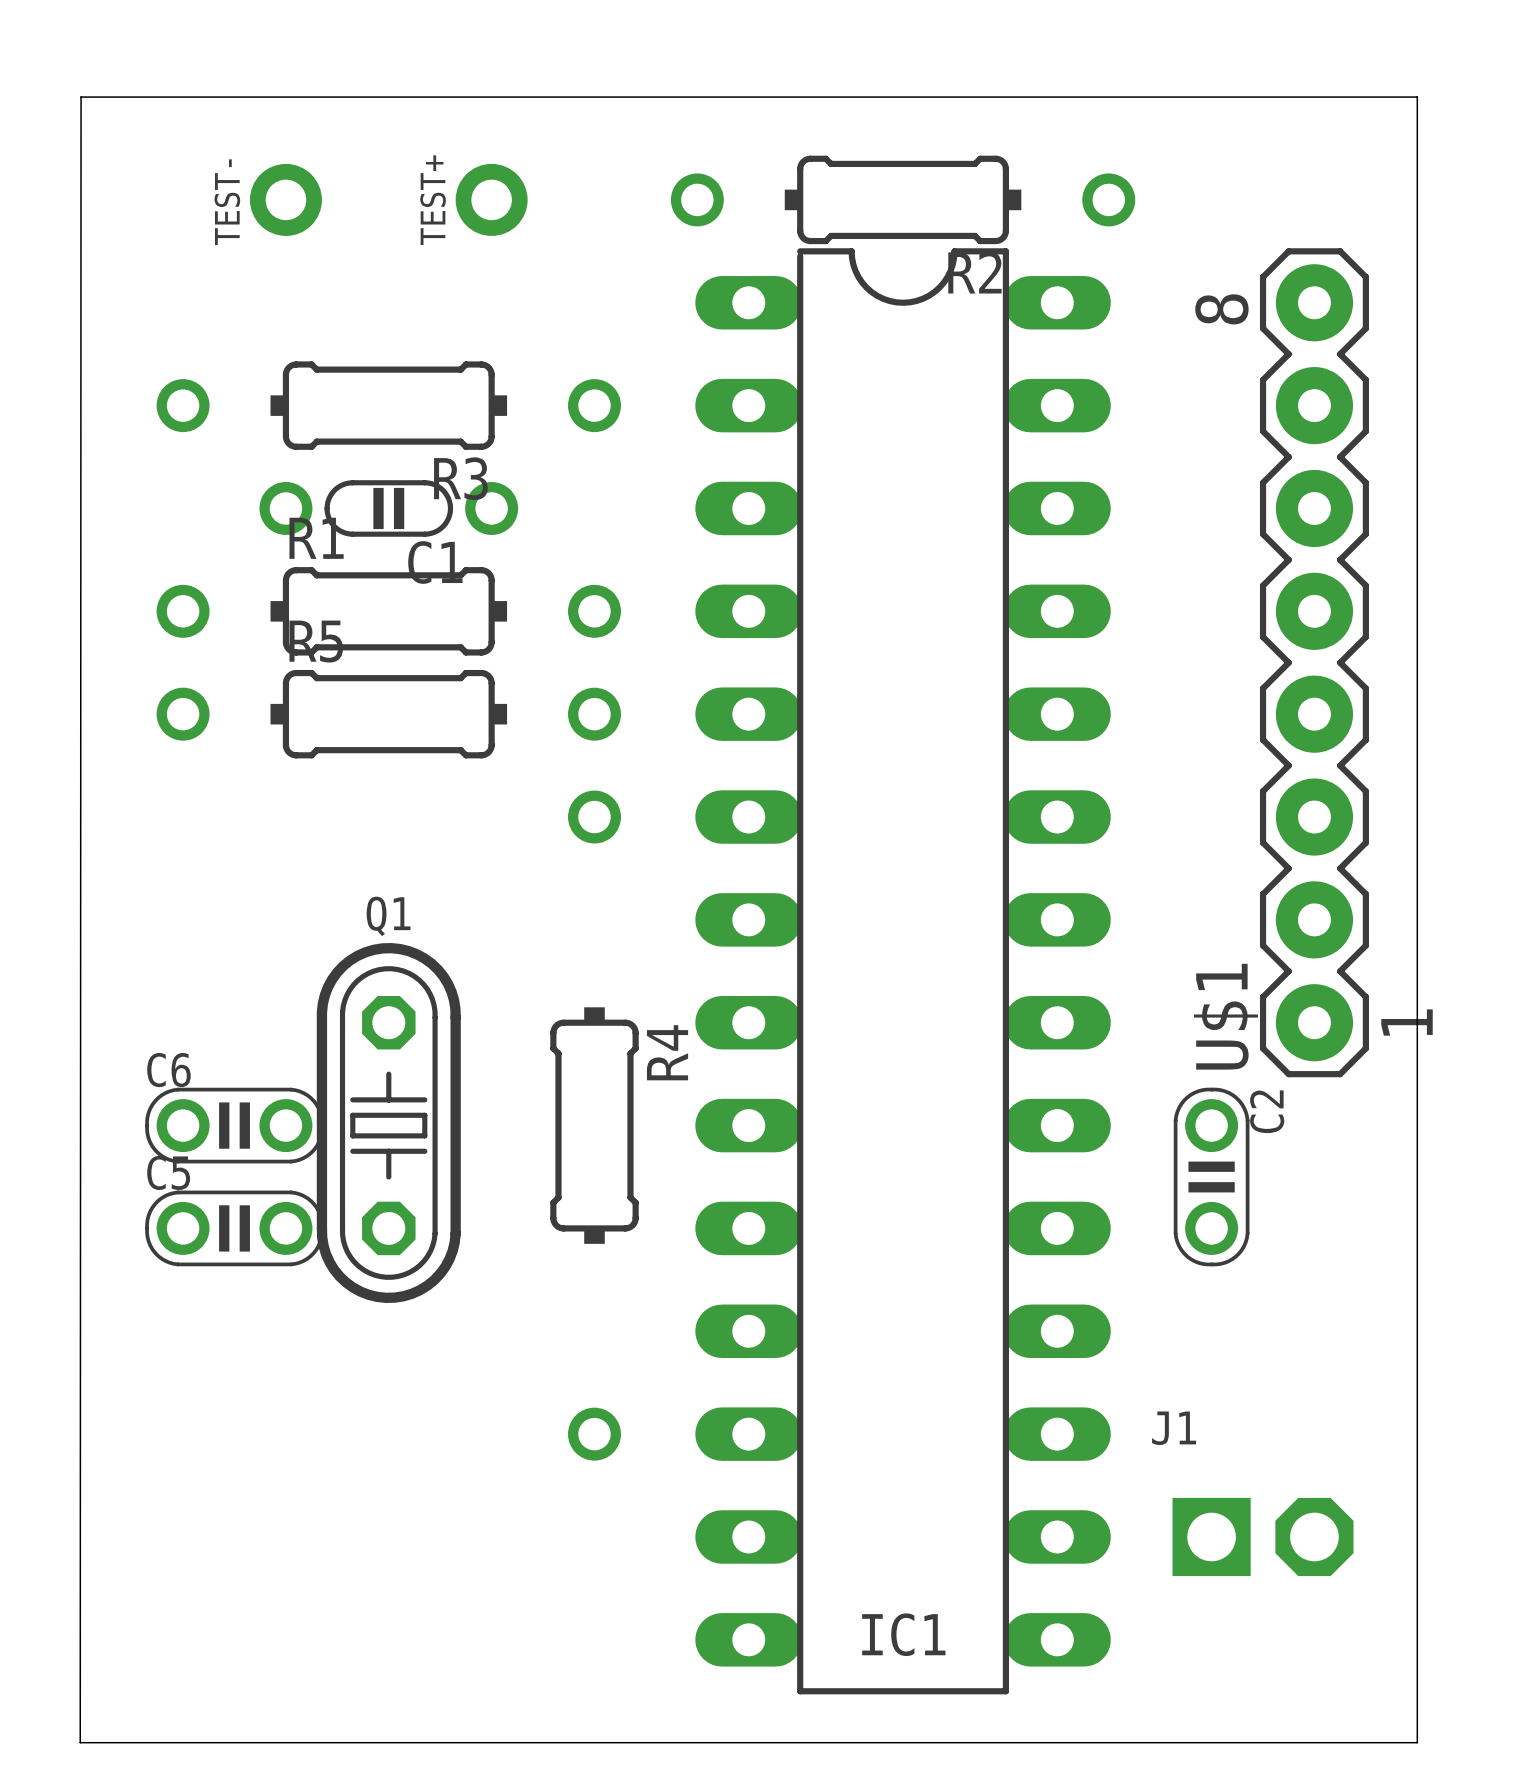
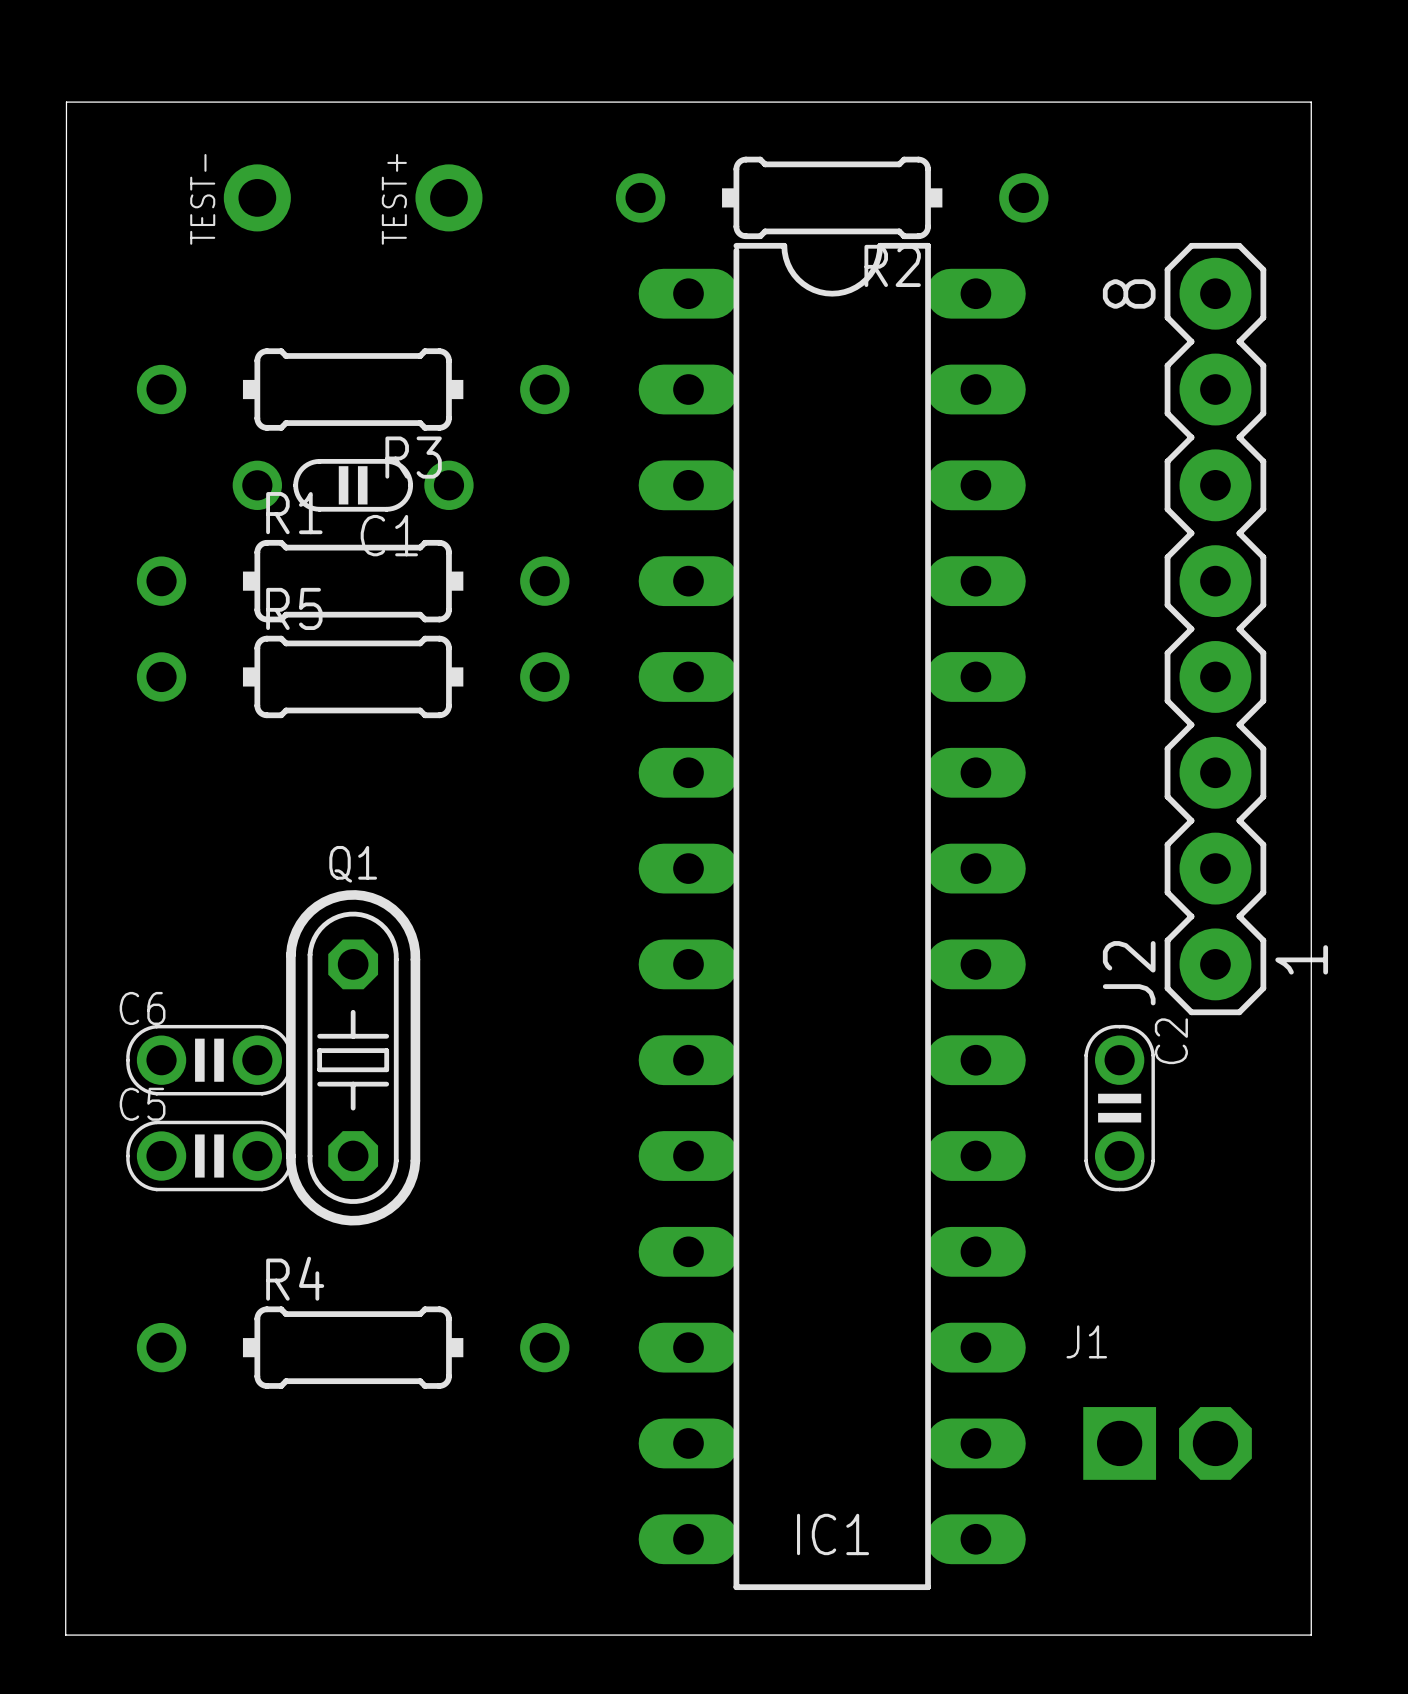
R4 footprint: [550, 790, 639, 1461] -> [136, 1306, 570, 1389]
U$1 name: U$1 (1225, 1016) -> J2 (1129, 973)
R4 name position: R4 (667, 1052) -> R4 (295, 1278)

